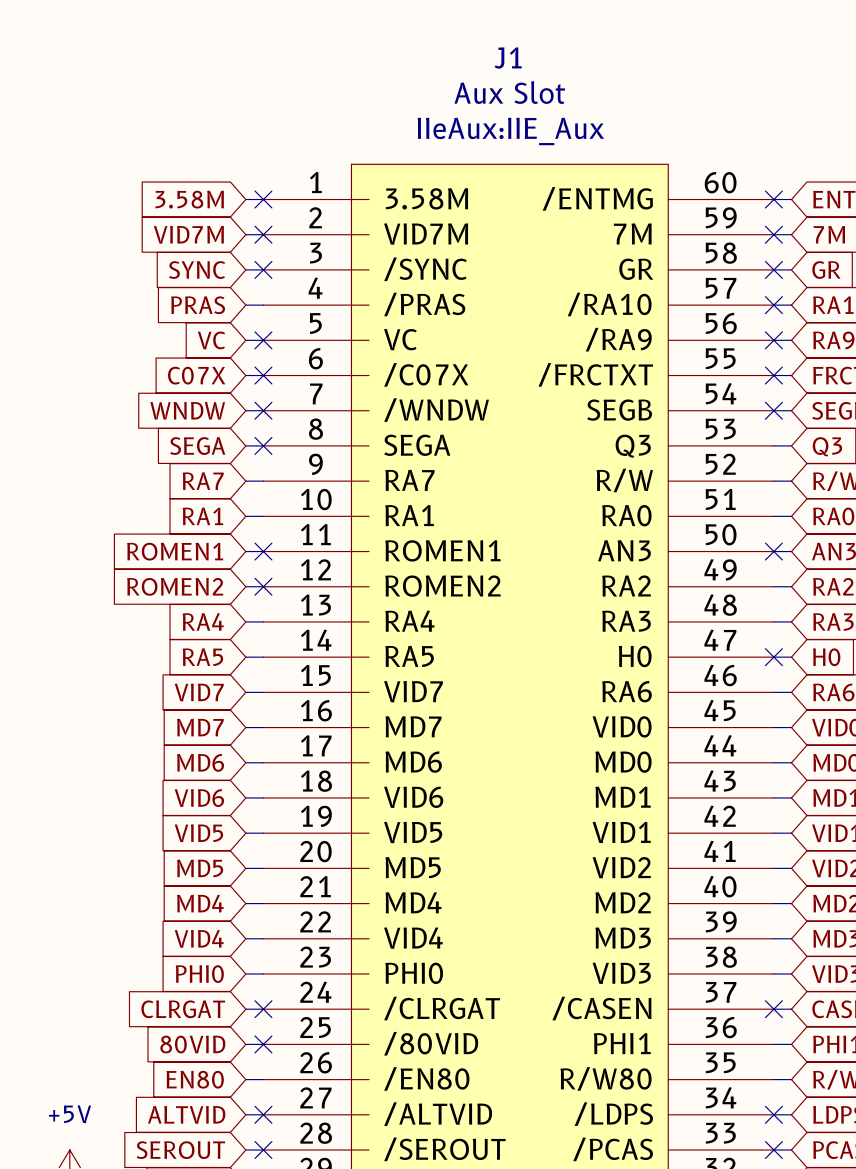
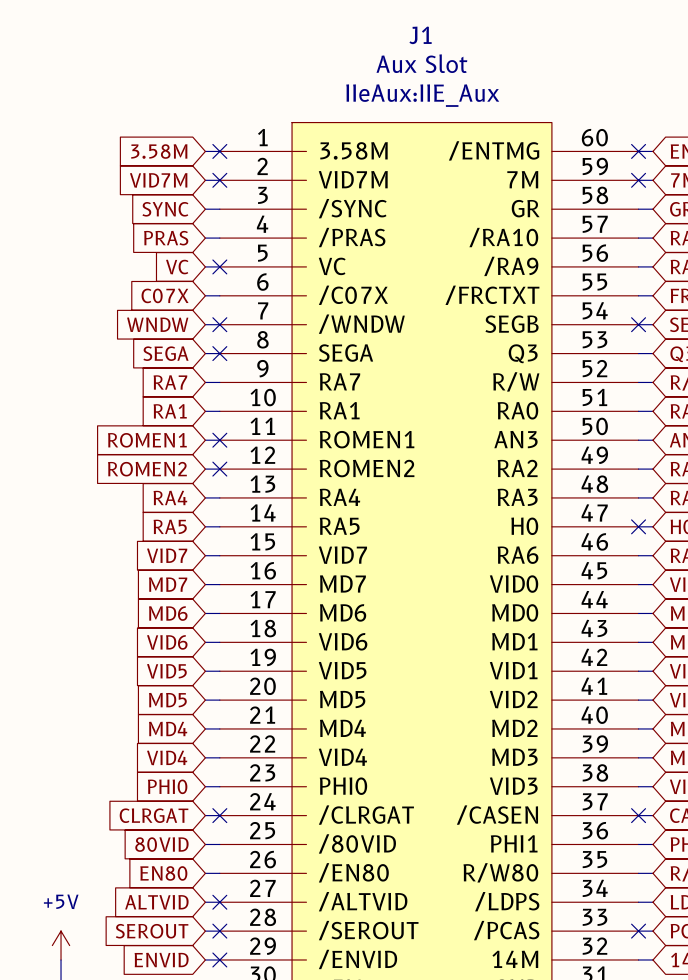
no-connect mark: (263, 269) -> none
no-connect mark: (773, 269) -> none
no-connect mark: (773, 305) -> none
no-connect mark: (773, 340) -> none
no-connect mark: (263, 375) -> none
no-connect mark: (773, 375) -> none
no-connect mark: (773, 551) -> none
no-connect mark: (263, 1044) -> none
no-connect mark: (773, 1114) -> none

